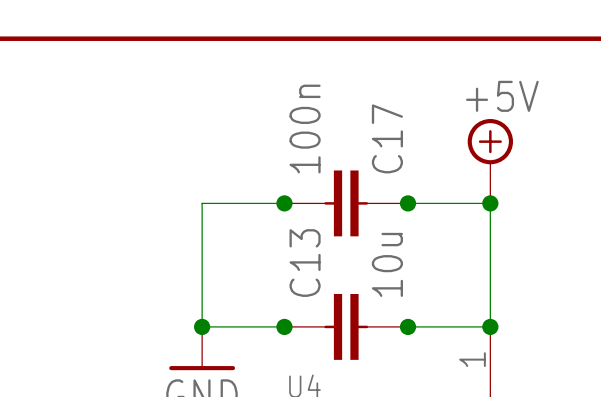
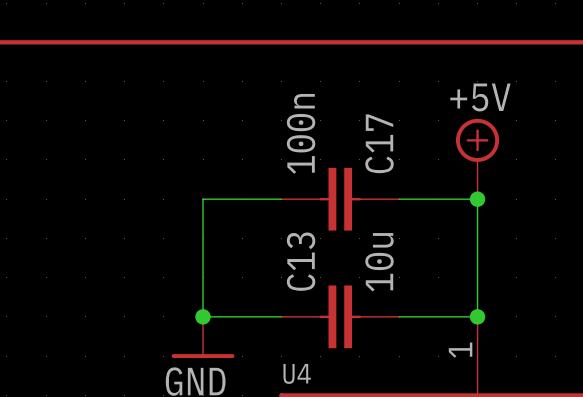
junction: (284, 203) -> none
junction: (408, 203) -> none
junction: (284, 326) -> none
junction: (408, 326) -> none

